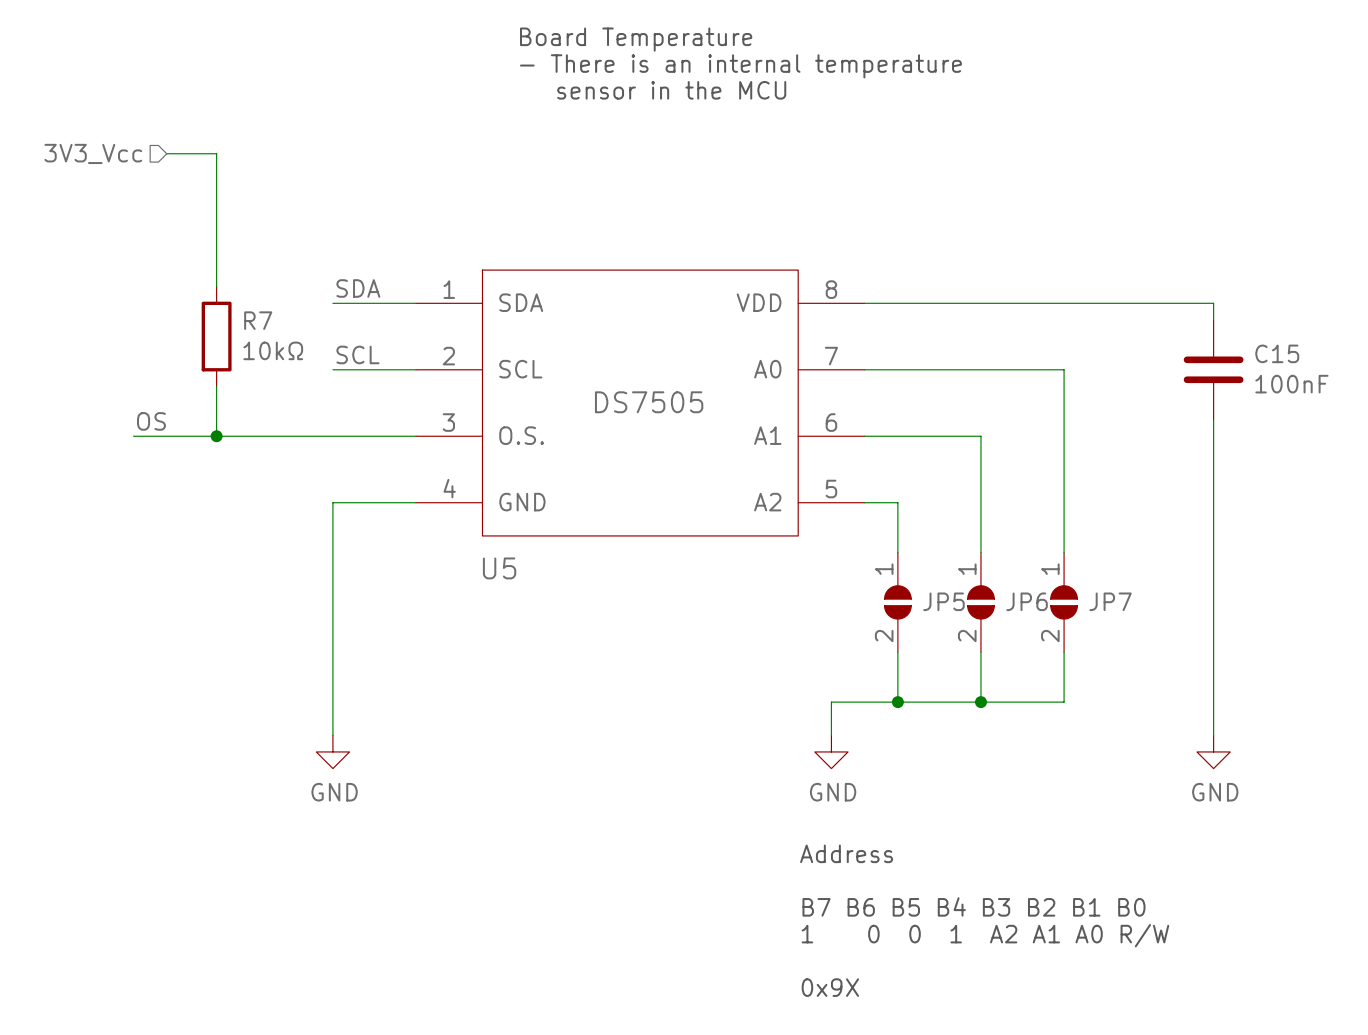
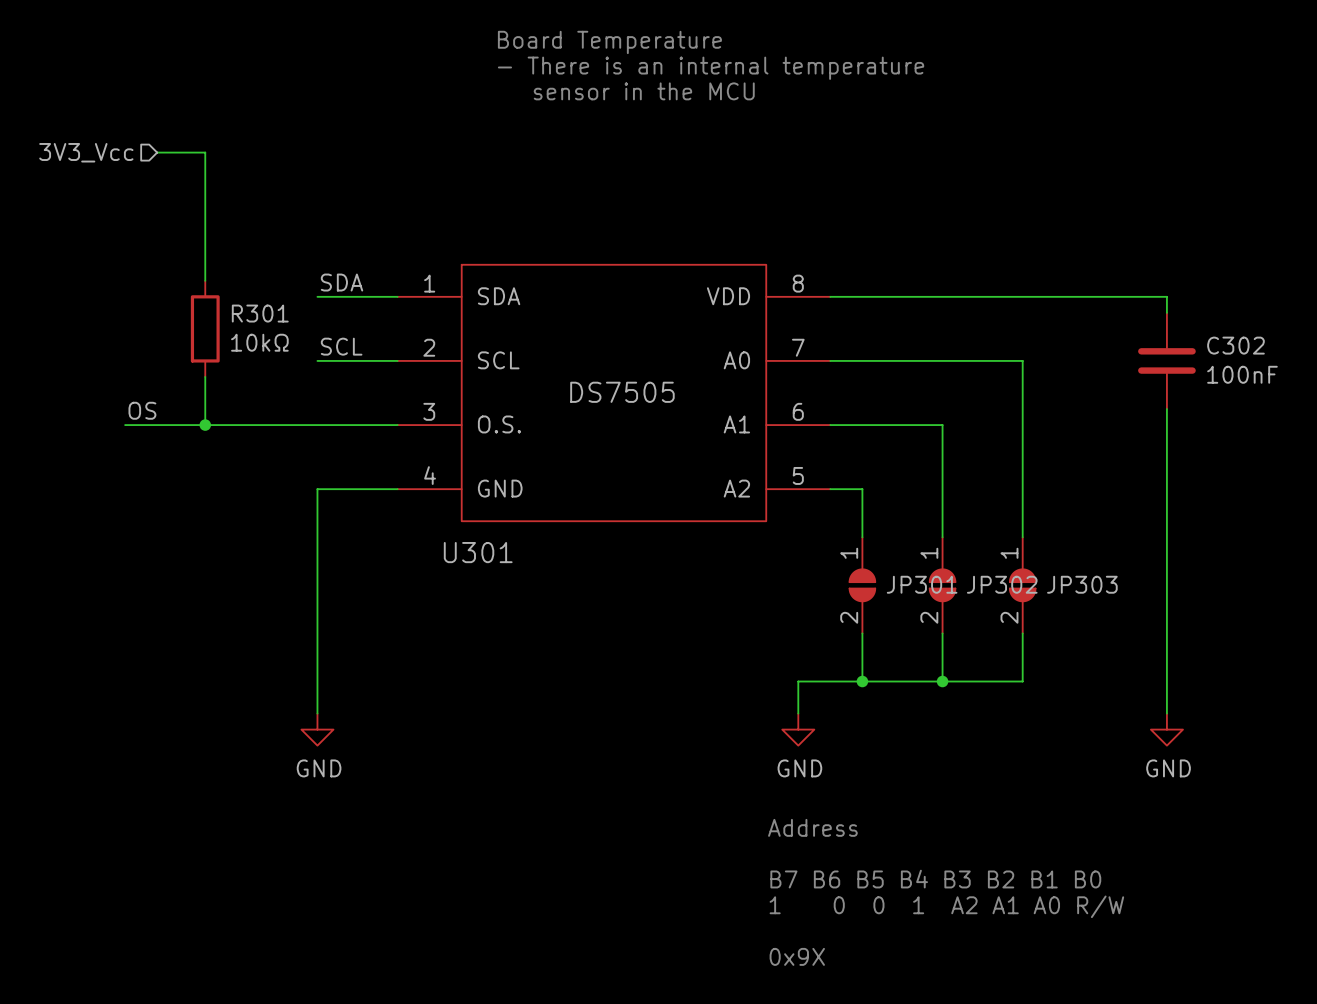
R7 name: R7 (258, 320) -> R301 (260, 313)
C15 name: C15 (1277, 353) -> C302 (1235, 345)
U5 name: U5 (499, 568) -> U301 (478, 552)
JP5 name: JP5 (943, 601) -> JP301 (922, 584)
JP6 name: JP6 (1027, 601) -> JP302 (1002, 584)
JP7 name: JP7 (1110, 601) -> JP303 (1082, 584)

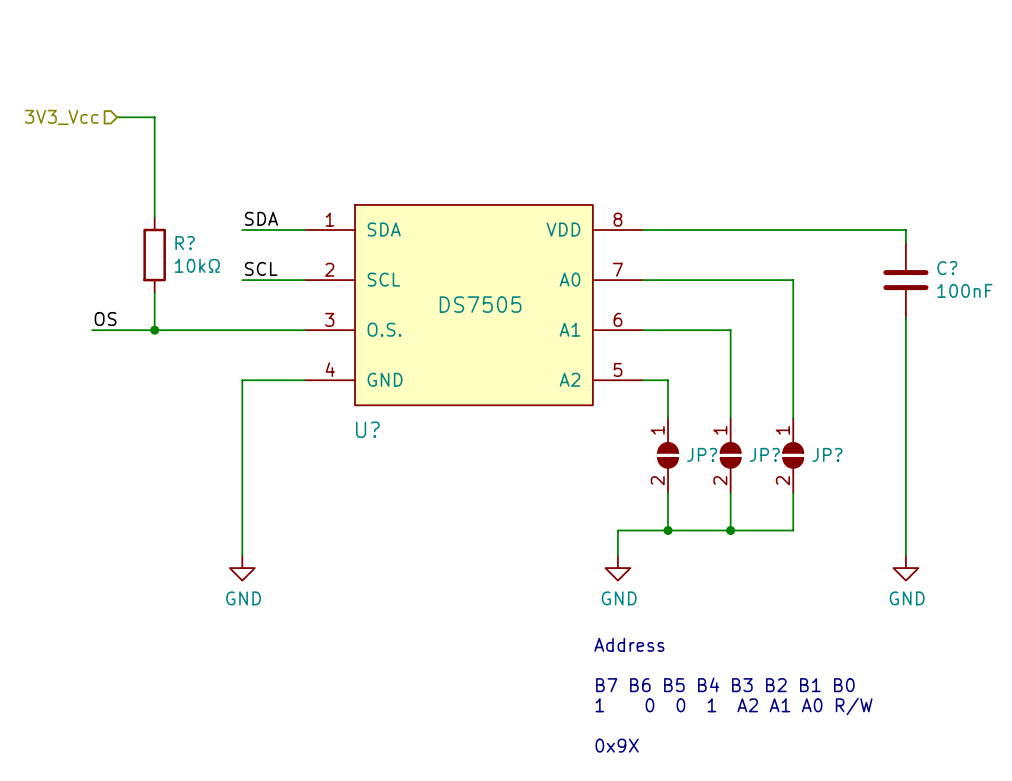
text: Board Temperature (609, 42) -> none
text: - There is an internal temperature (711, 68) -> none
text: sensor in the MCU (644, 91) -> none
R301 name: R301 (260, 313) -> R? (185, 243)
C302 name: C302 (1235, 345) -> C? (947, 268)
U301 name: U301 (478, 552) -> U? (367, 429)
JP301 name: JP301 (922, 584) -> JP? (702, 454)
JP302 name: JP302 (1002, 584) -> JP? (764, 454)
JP303 name: JP303 (1082, 584) -> JP? (827, 454)

